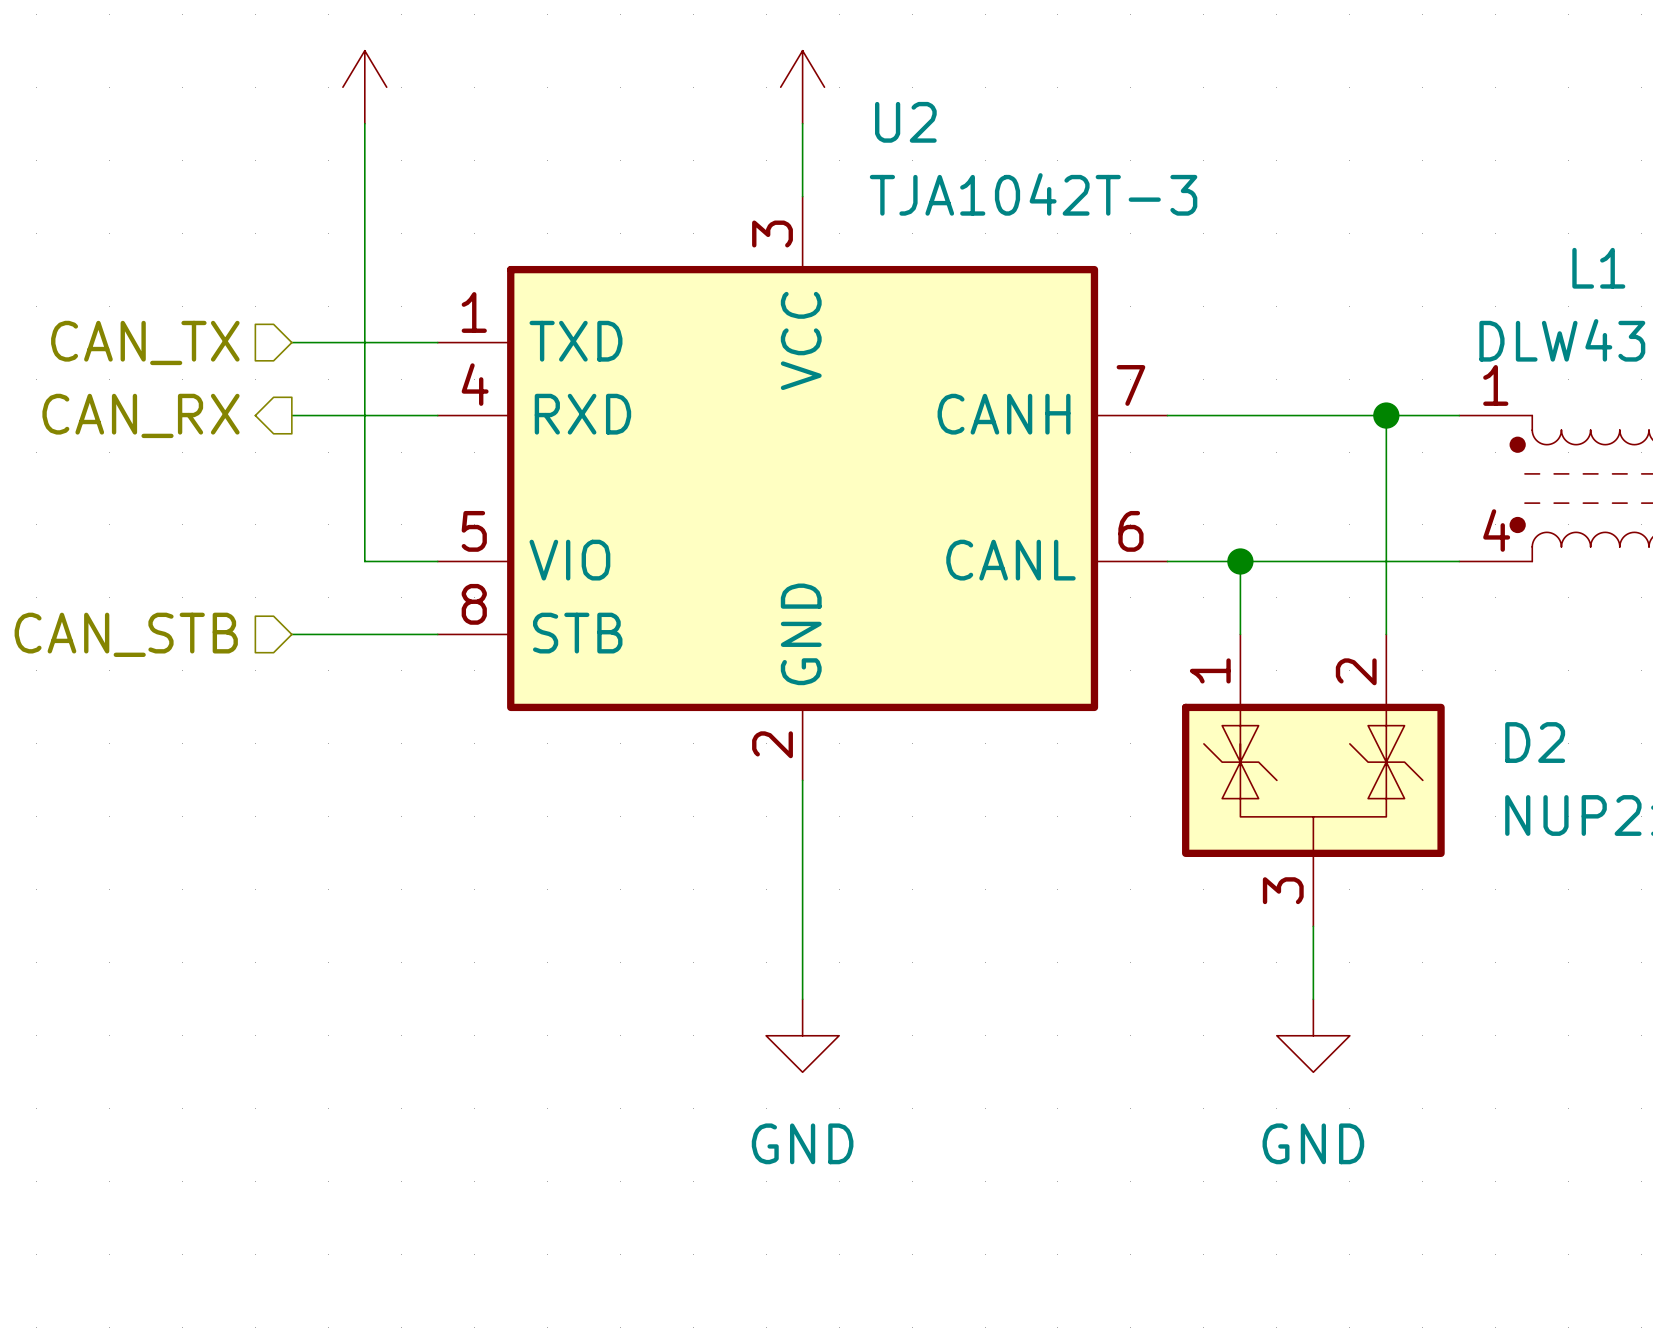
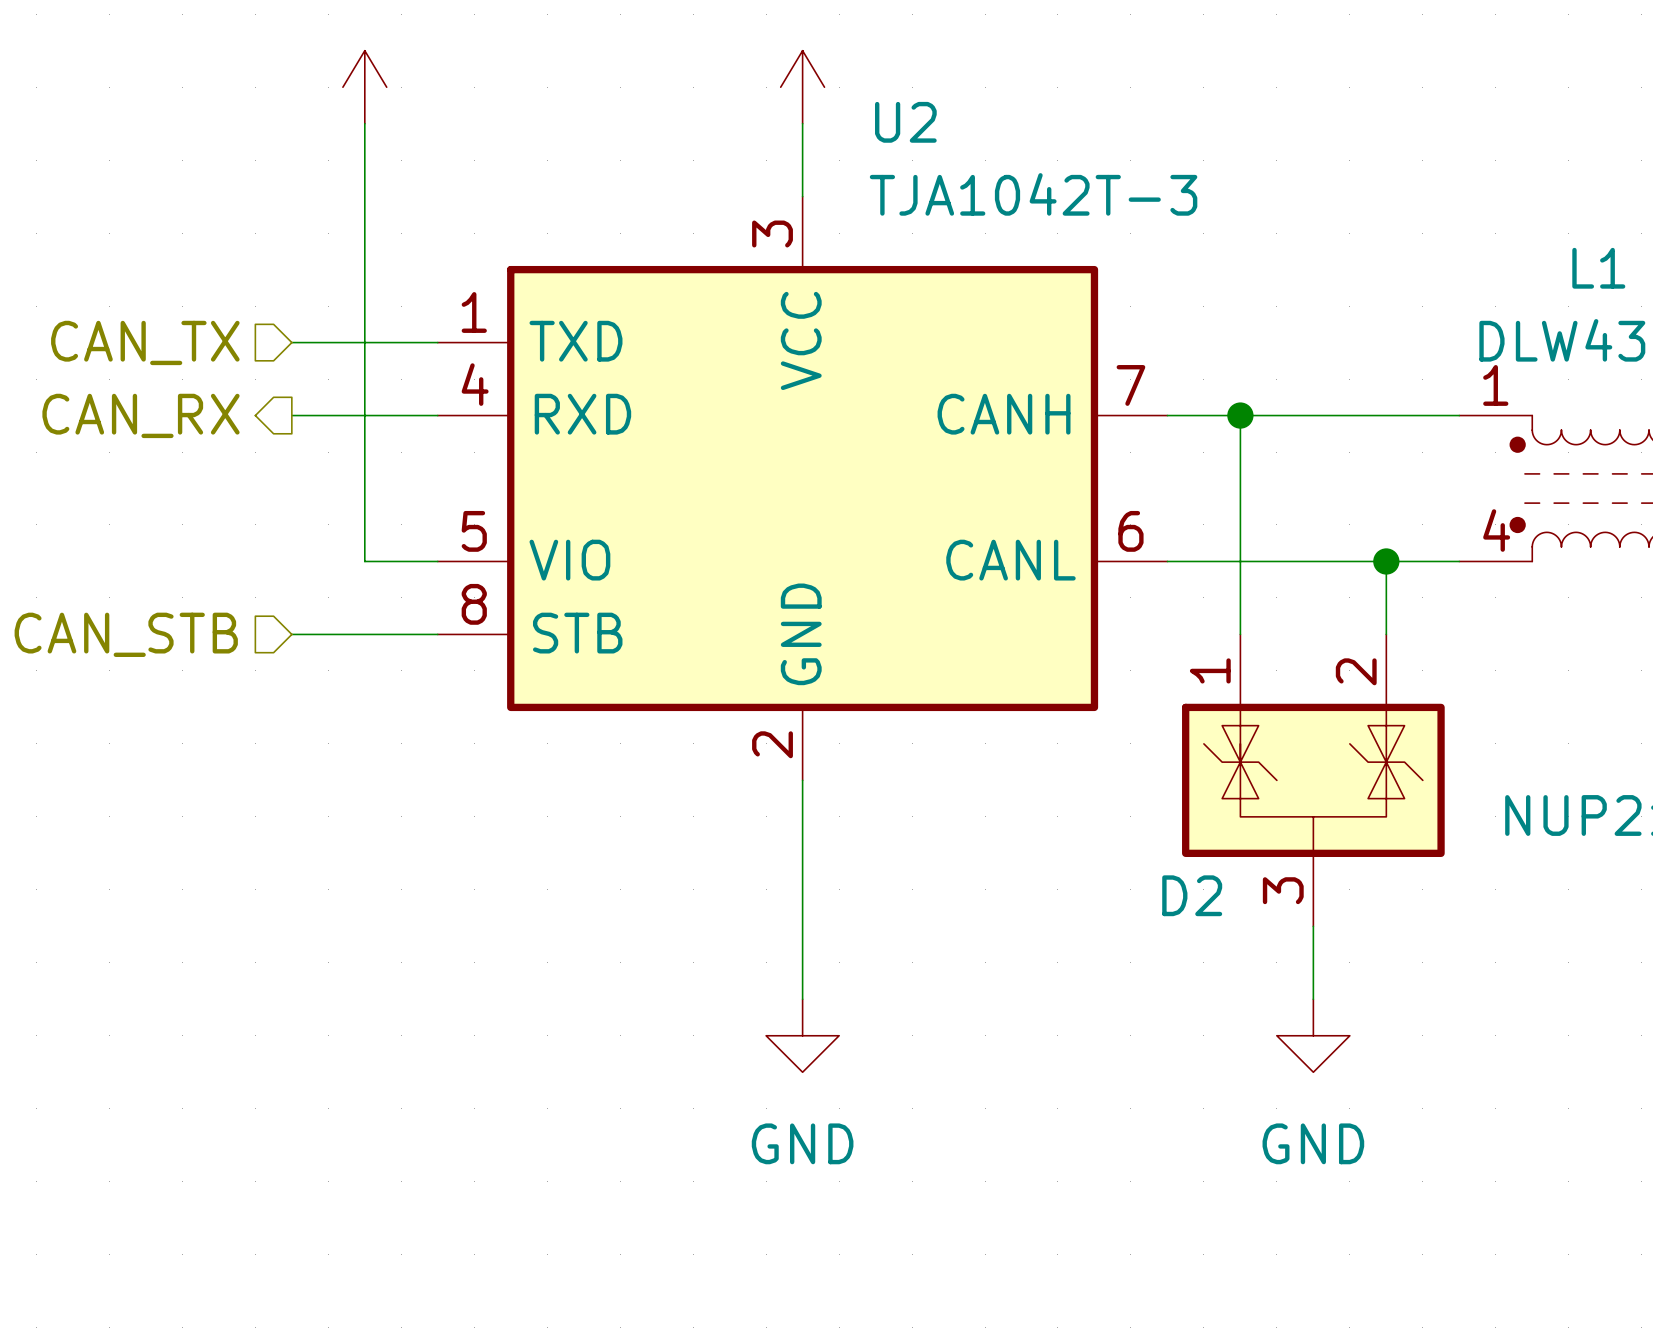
junction: none -> (1240, 415)
wire: (1386, 415) (1386, 561) -> (1240, 415) (1240, 561)
junction: (1386, 415) -> none
junction: (1240, 561) -> none
junction: none -> (1386, 561)
D2 name position: D2 (1535, 742) -> D2 (1192, 895)

